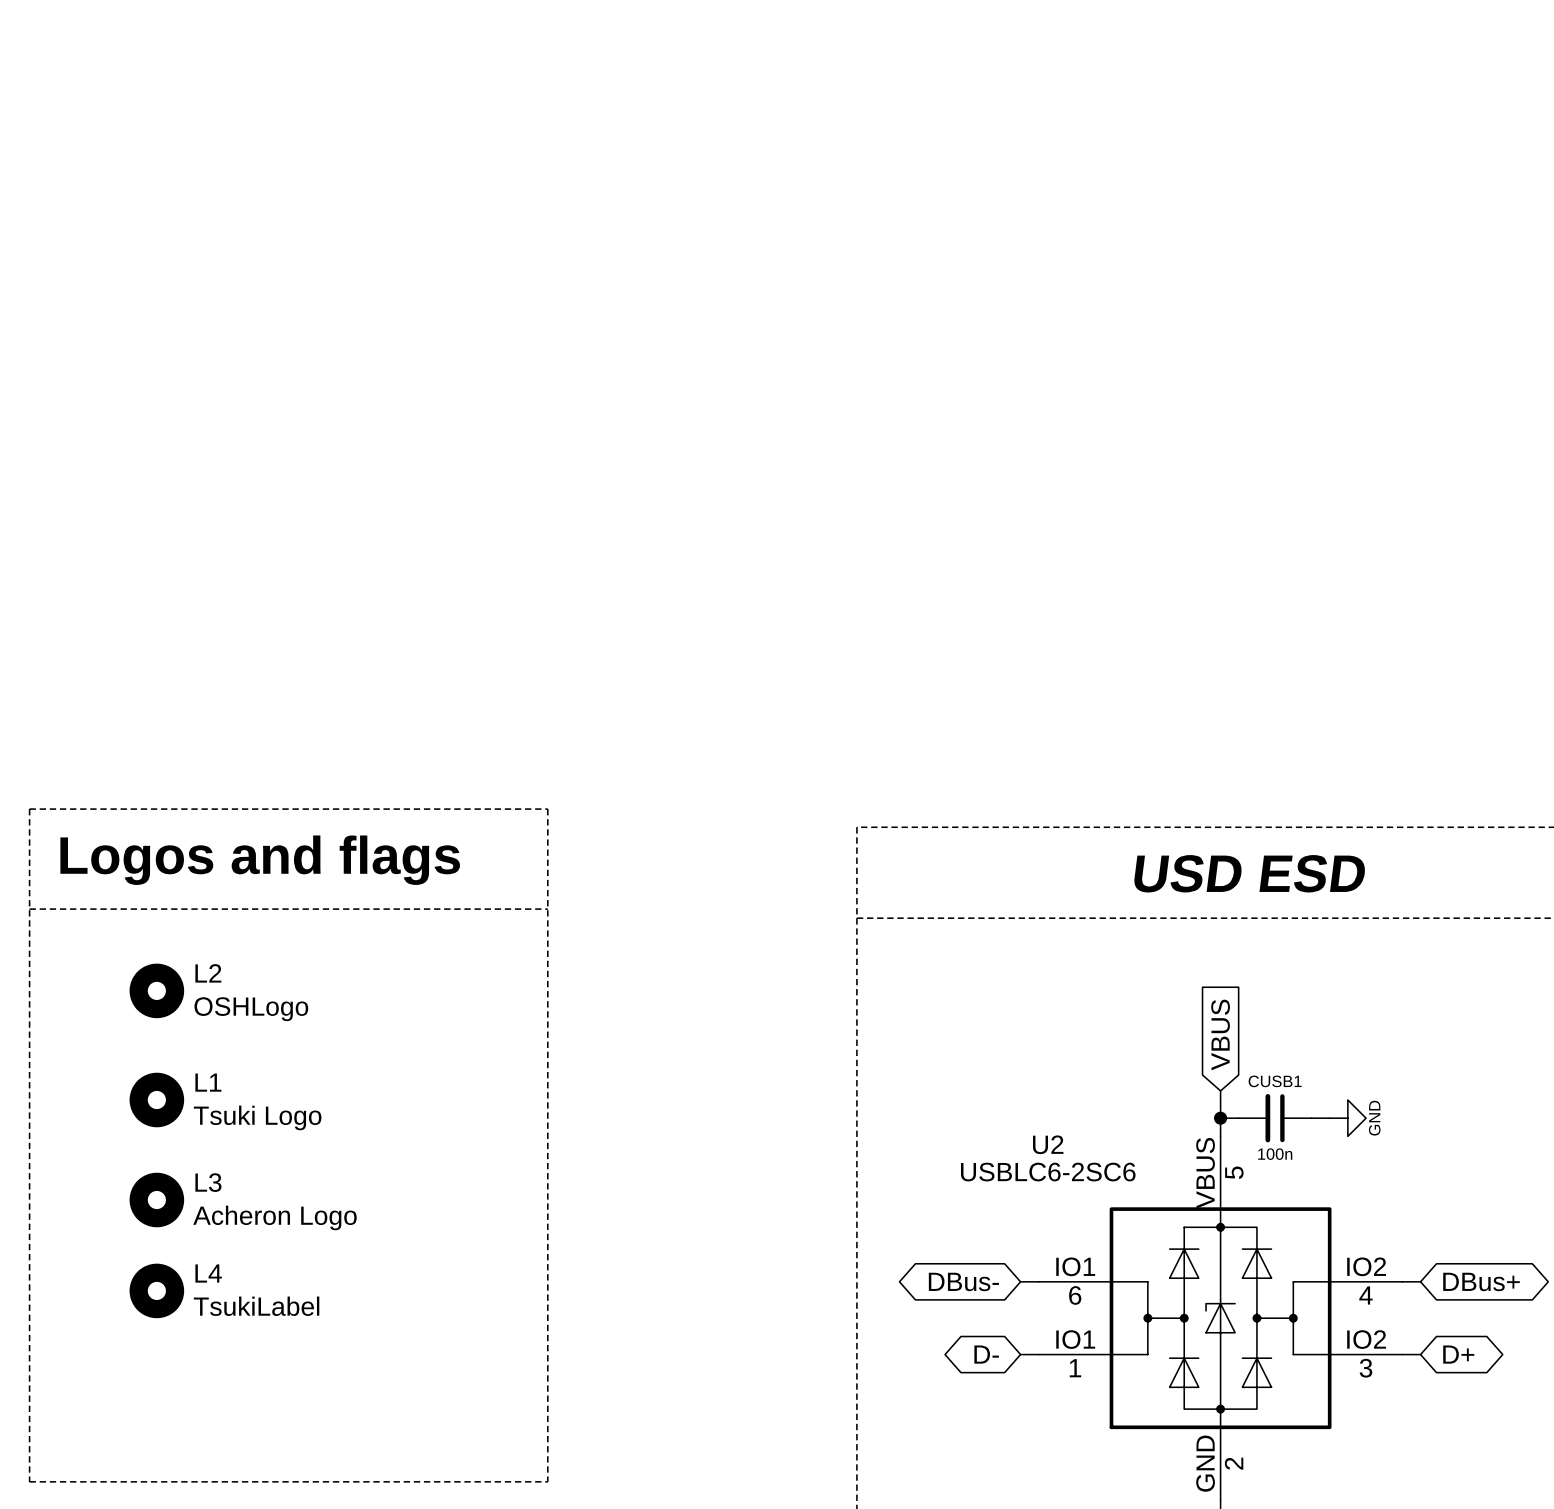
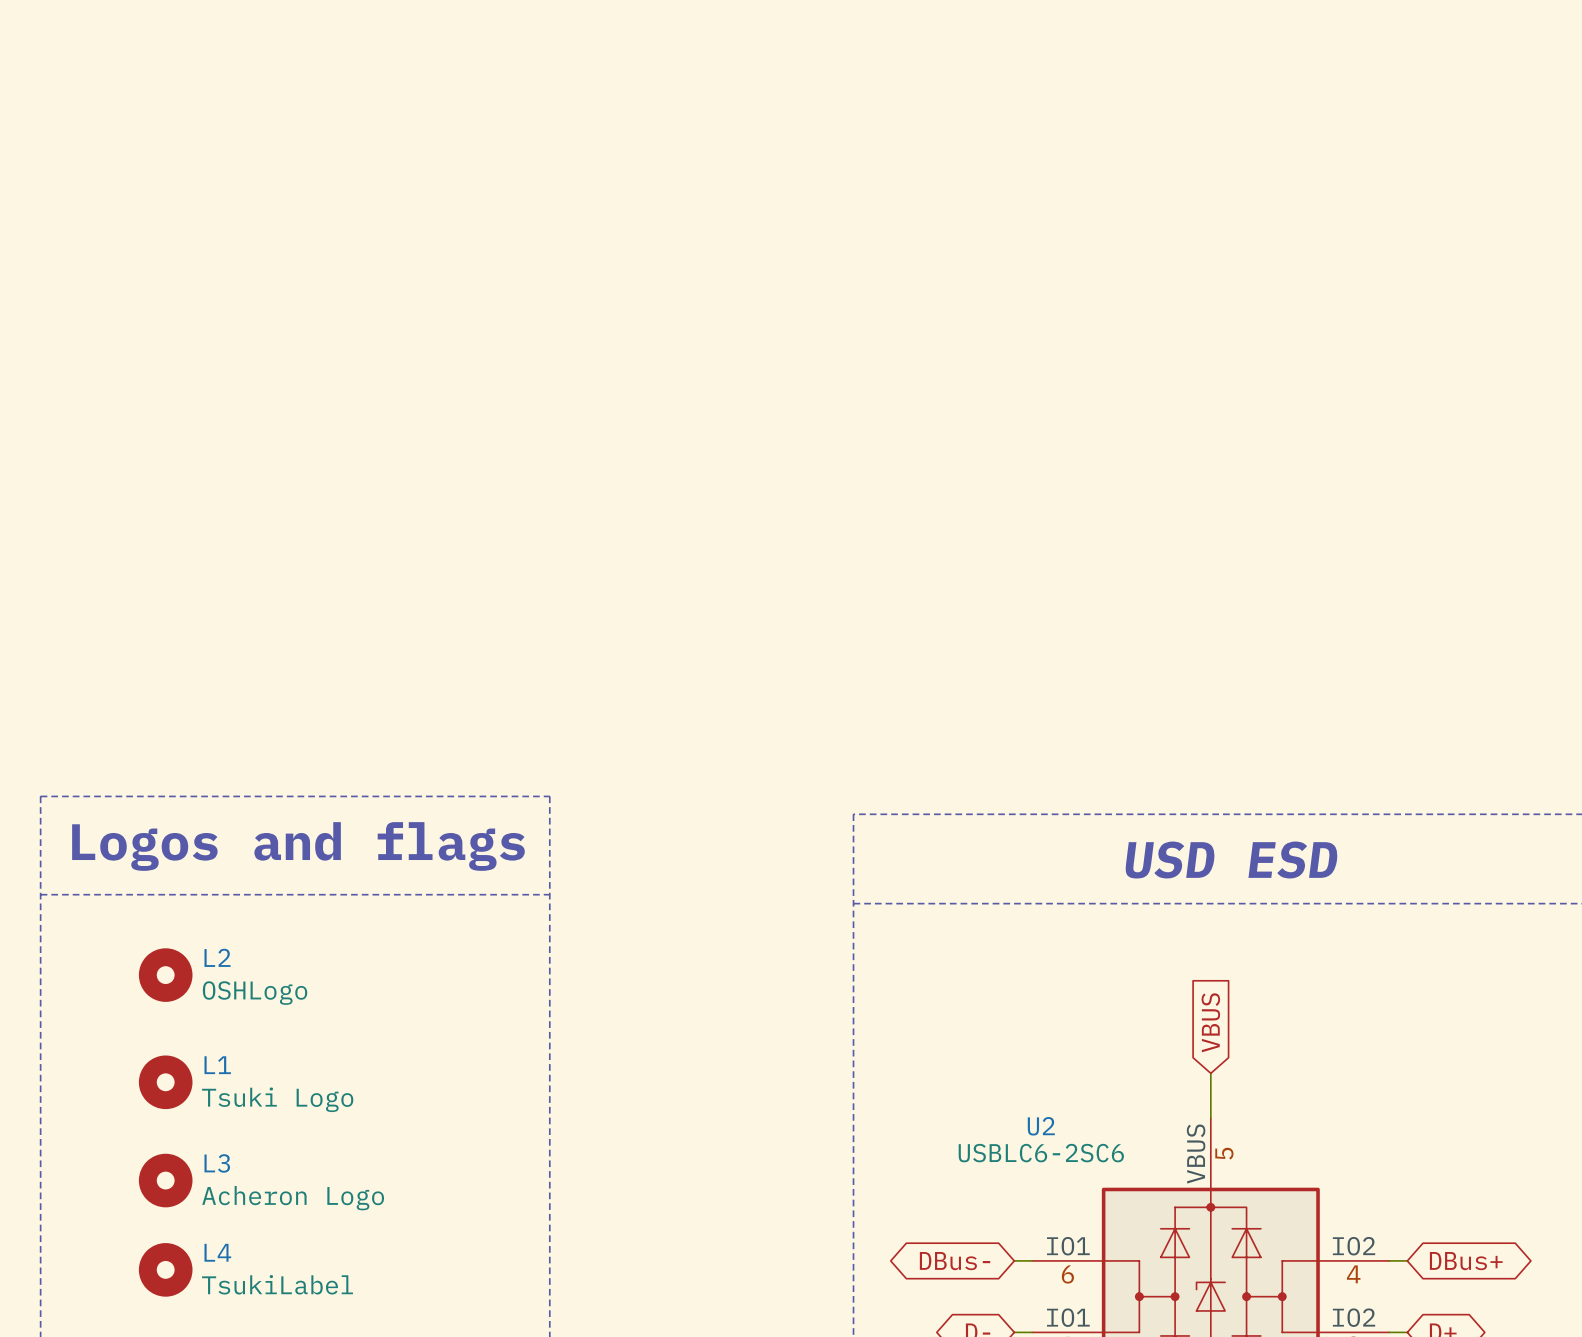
wire: (1220, 1118) (1238, 1118) -> none
junction: (1220, 1118) -> none
CUSB1: 100n (1275, 1118) -> none
wire: (1311, 1118) (1329, 1118) -> none
power symbol: GND (1347, 1118) -> none

